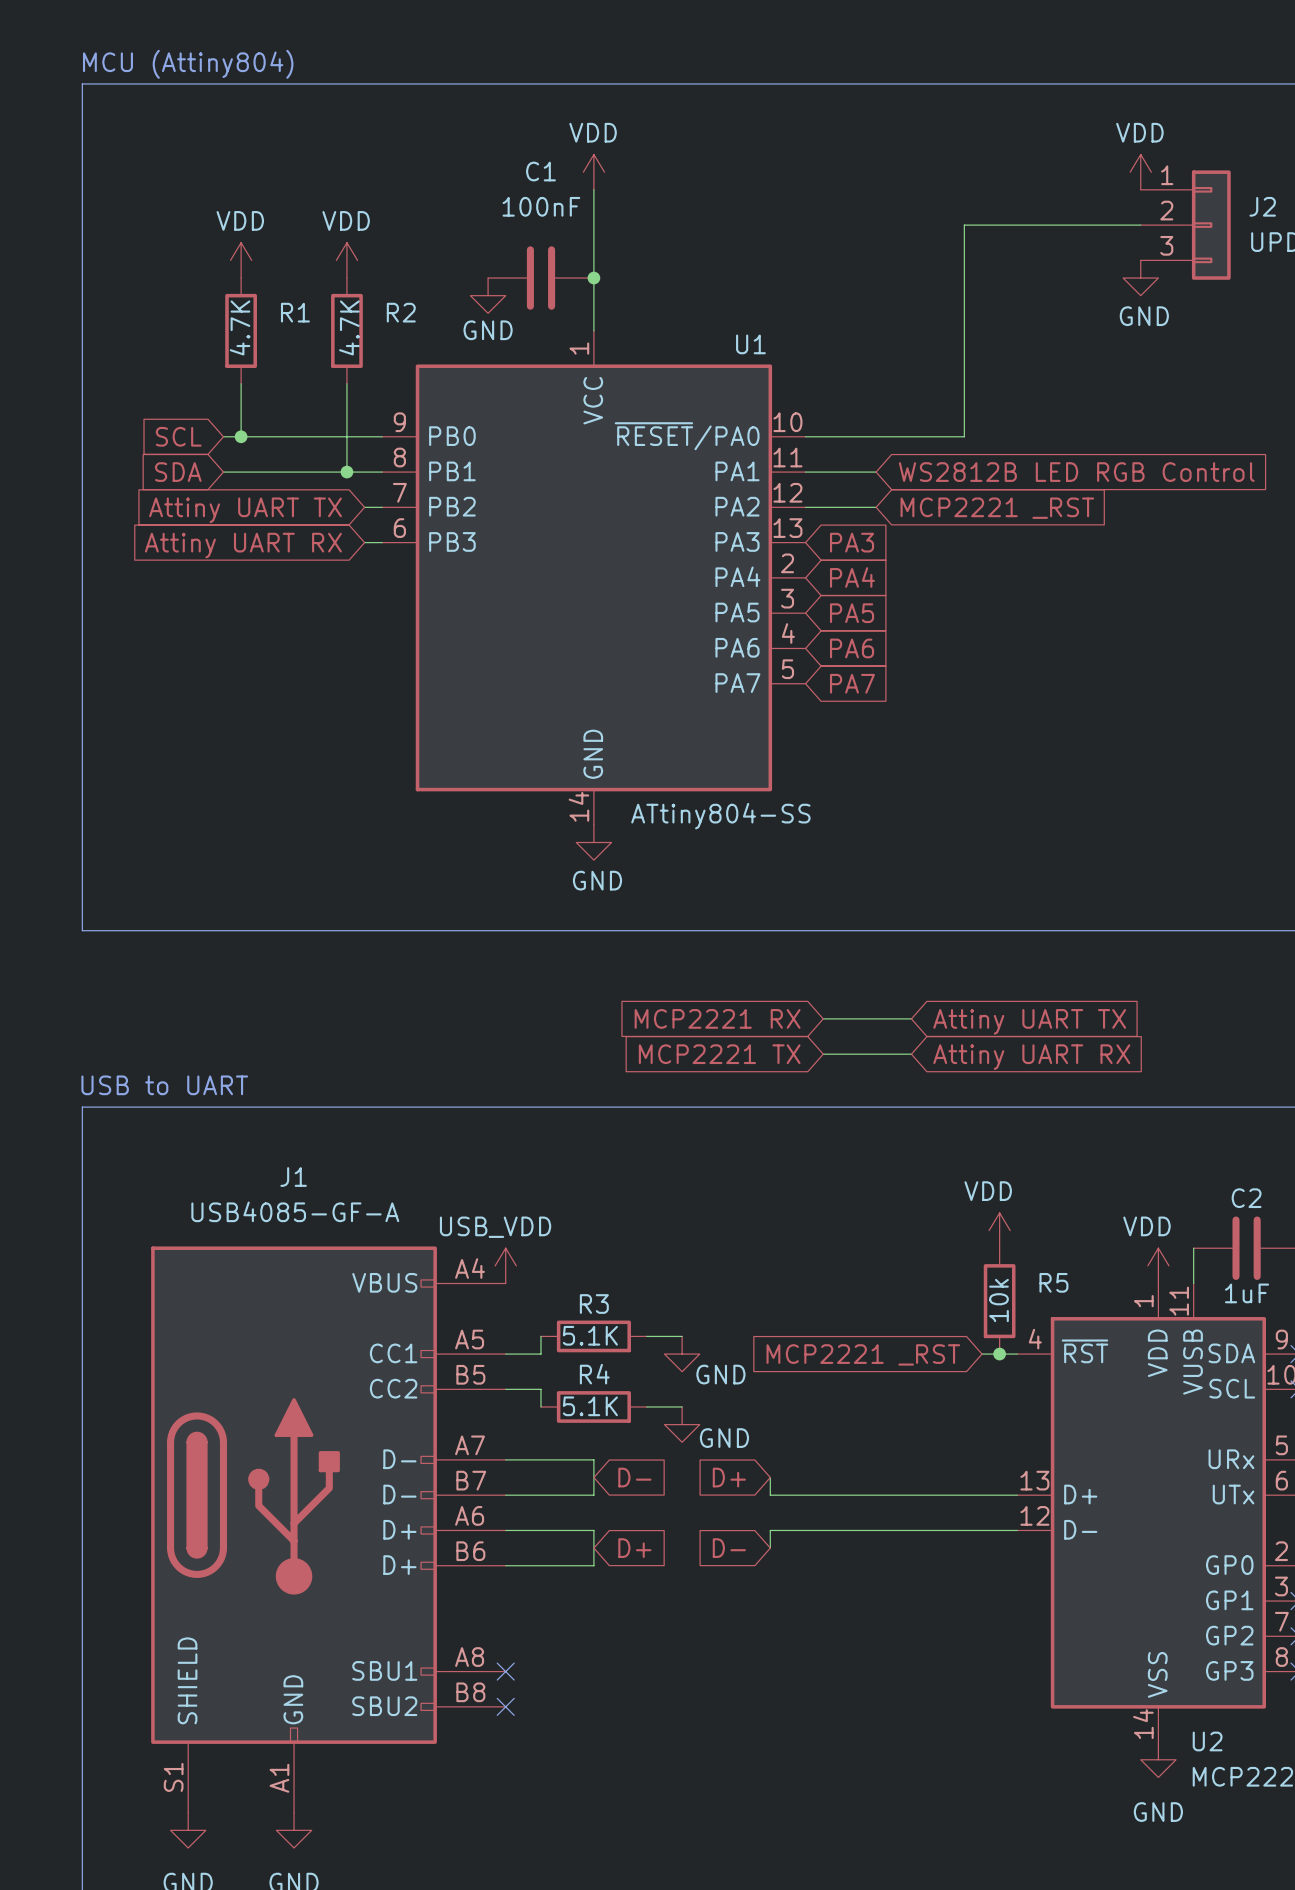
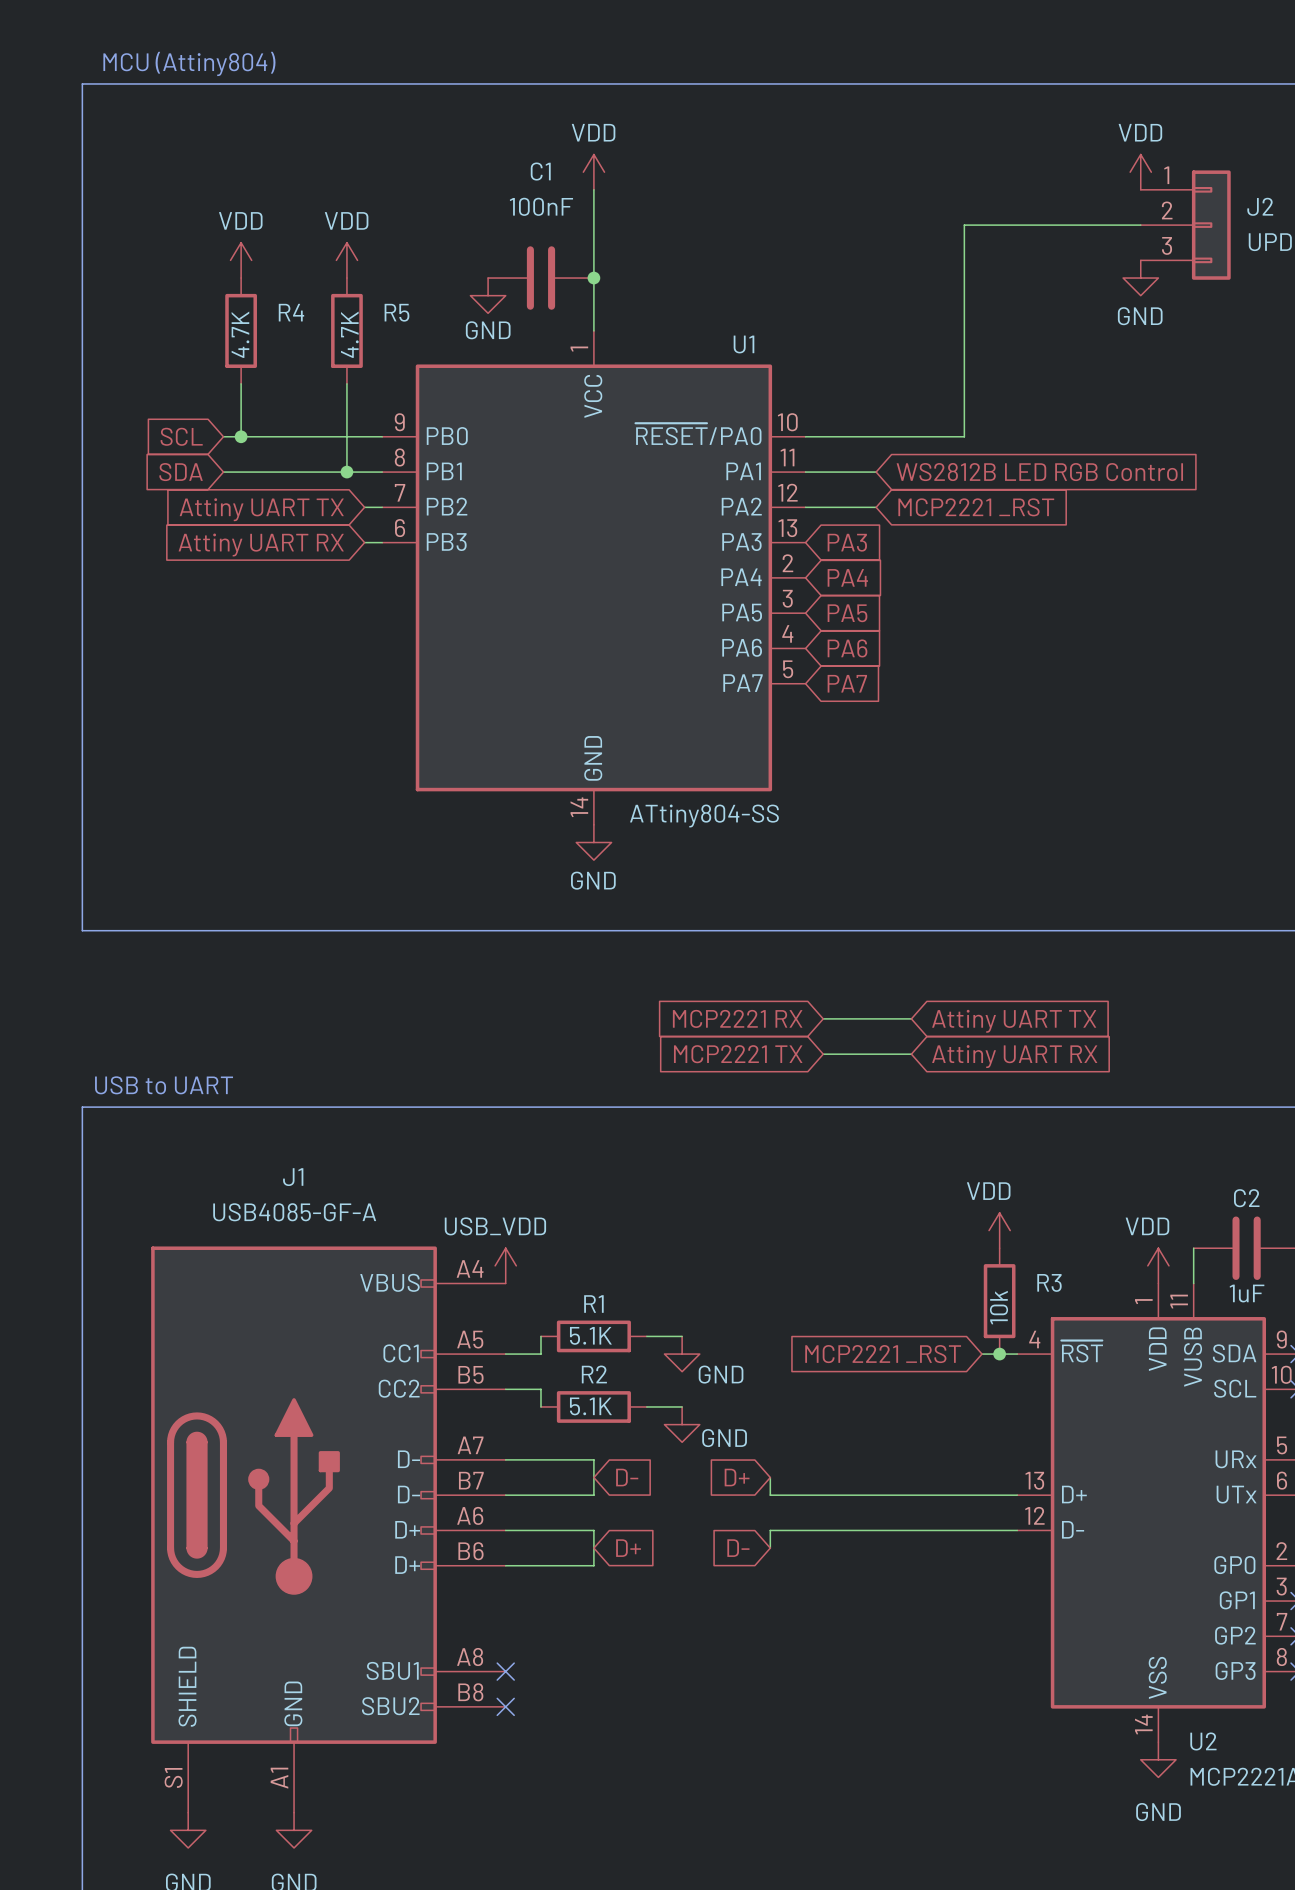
R1 name: R1 (295, 312) -> R4 (291, 312)
R2 name: R2 (401, 312) -> R5 (396, 312)
R5 name: R5 (1053, 1282) -> R3 (1049, 1282)
R3 name: R3 (594, 1304) -> R1 (593, 1304)
R4 name: R4 (594, 1374) -> R2 (594, 1374)

